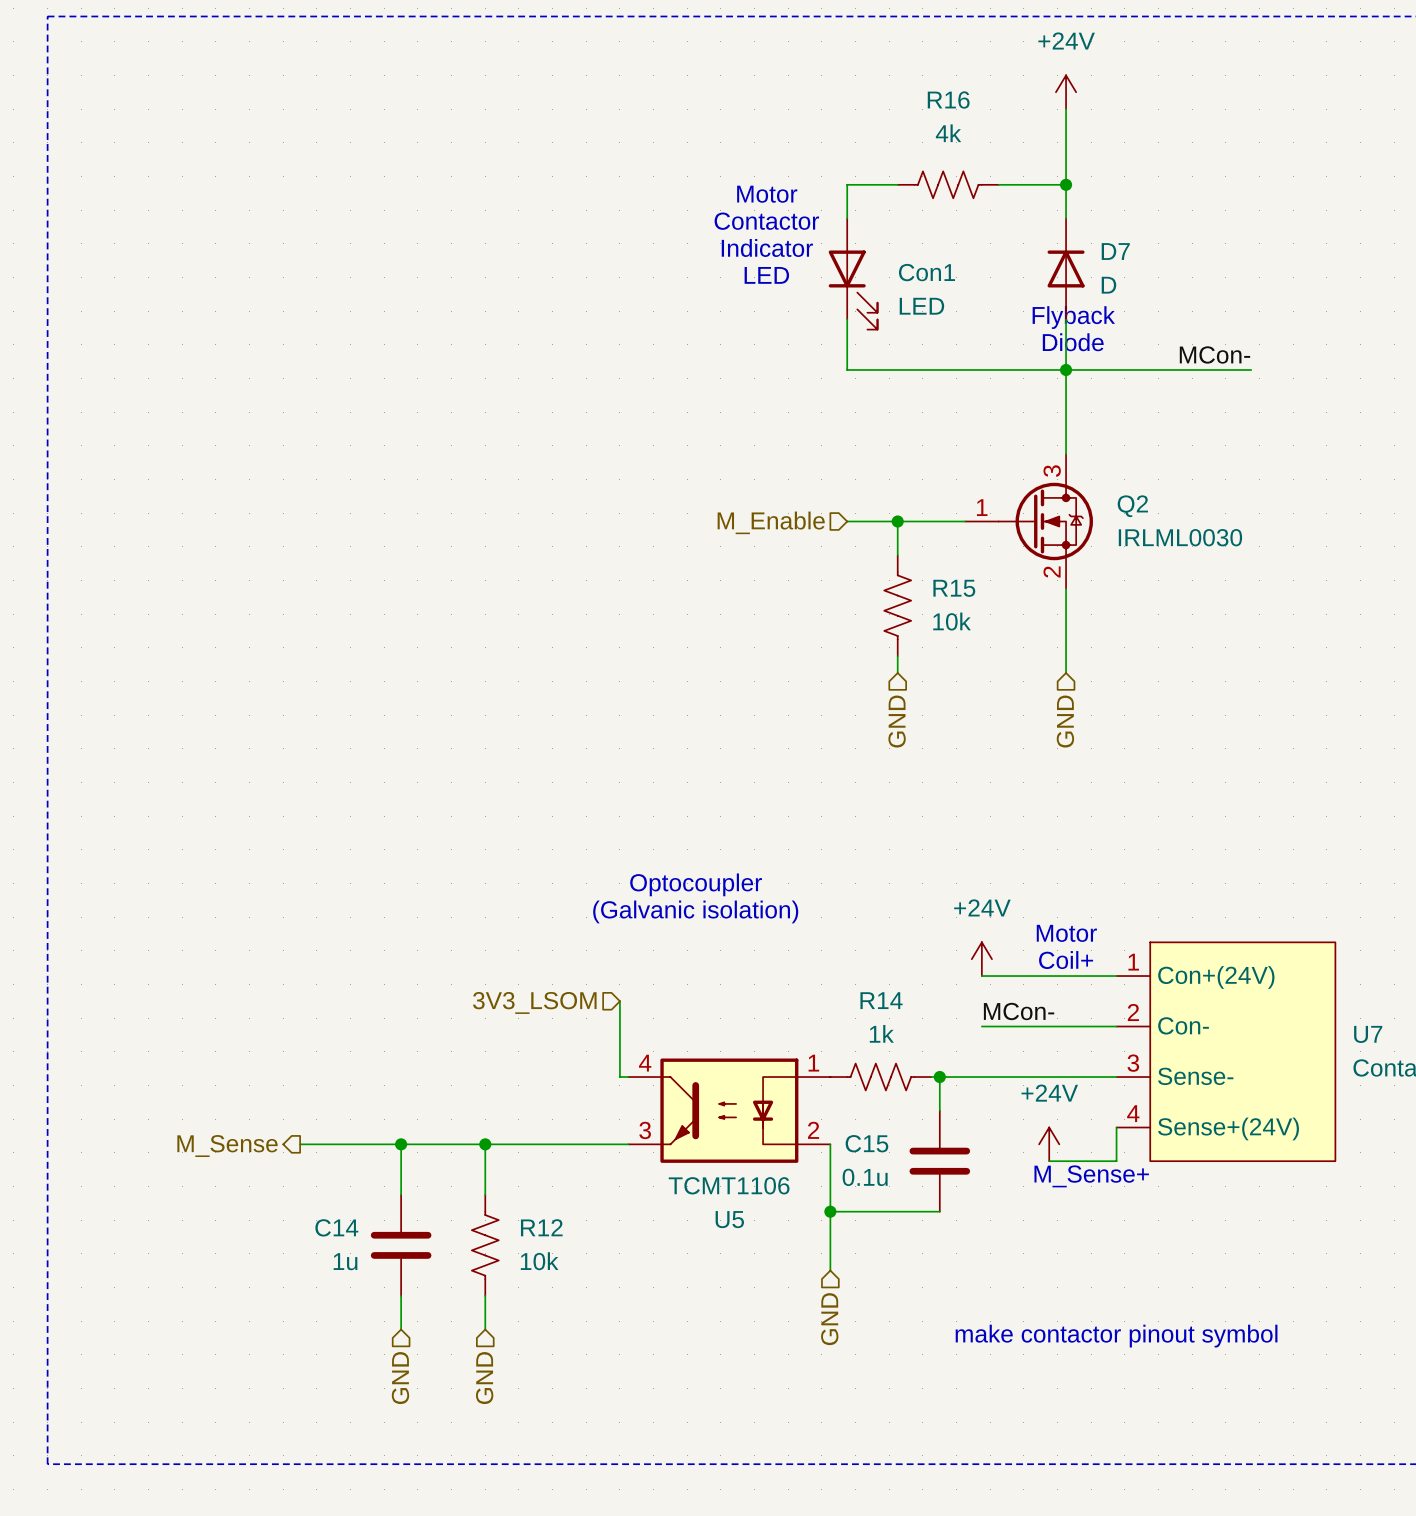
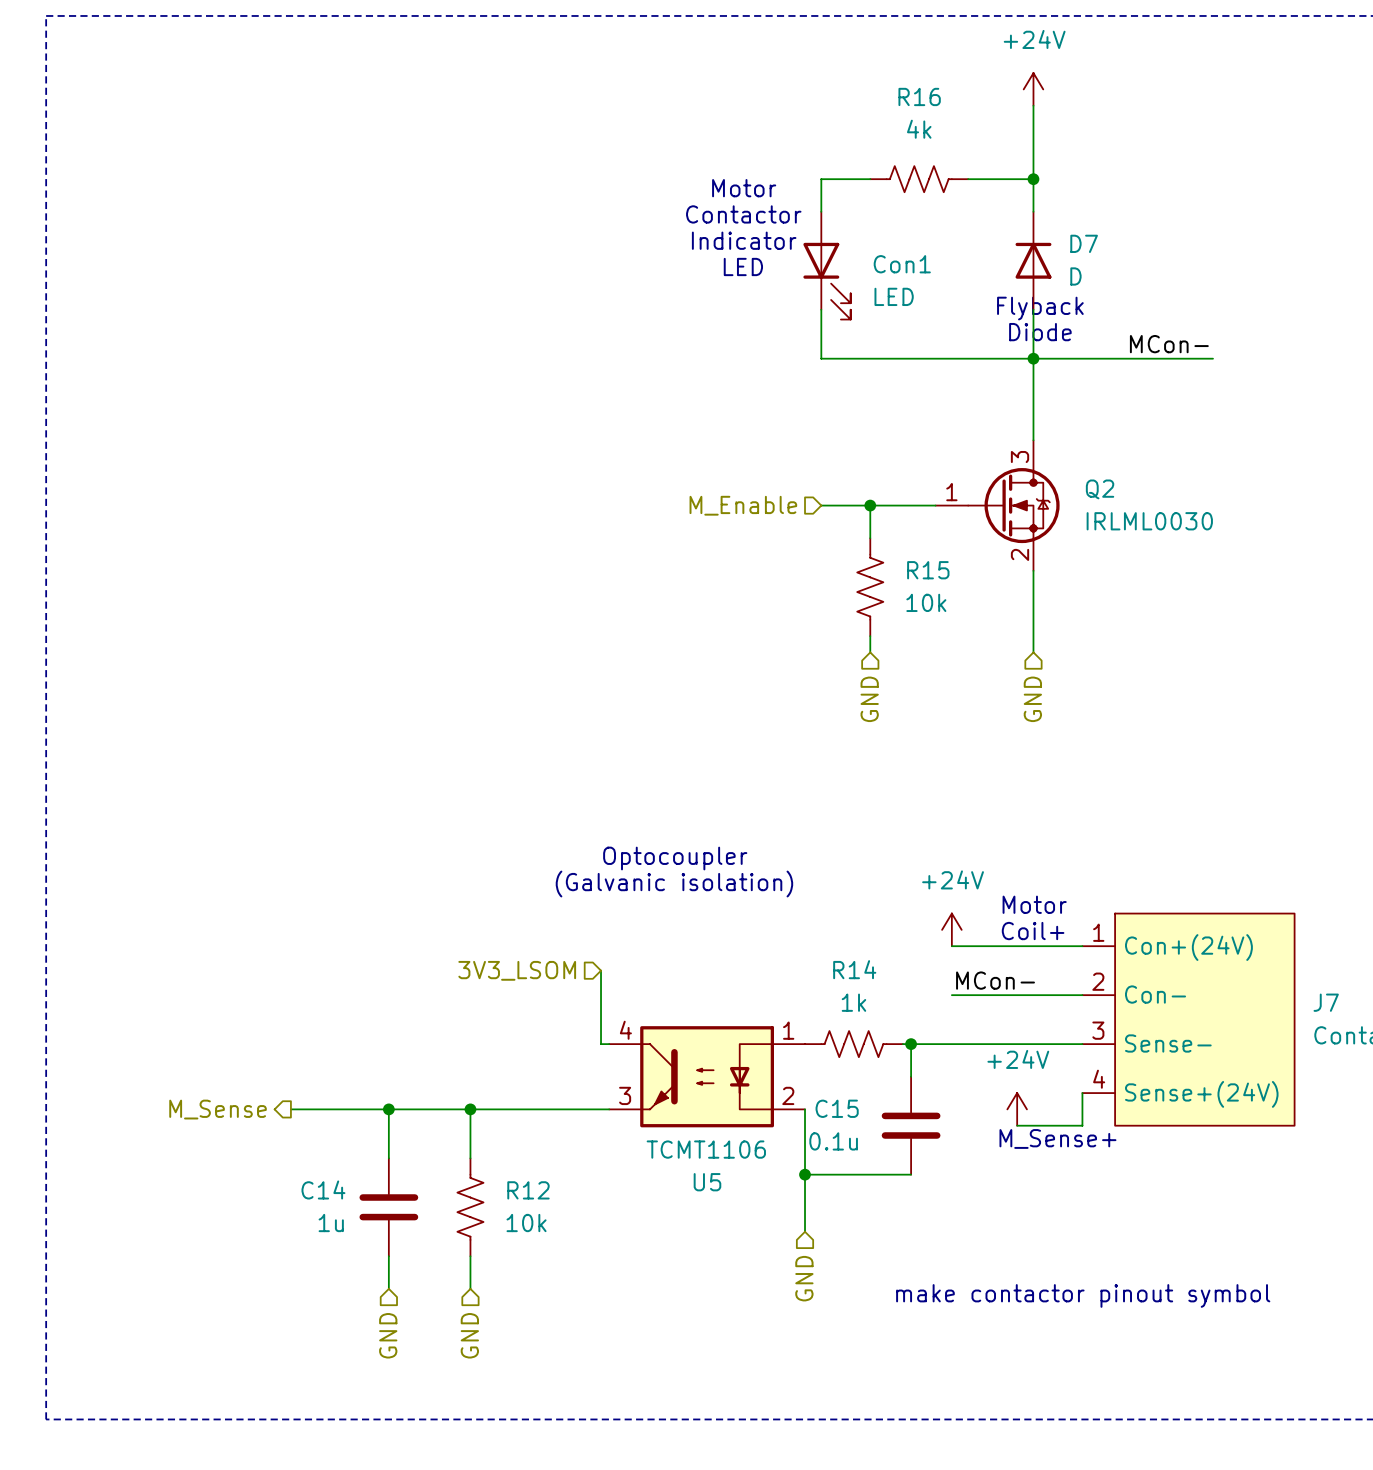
U7 name: U7 (1368, 1034) -> J7 (1326, 1002)

